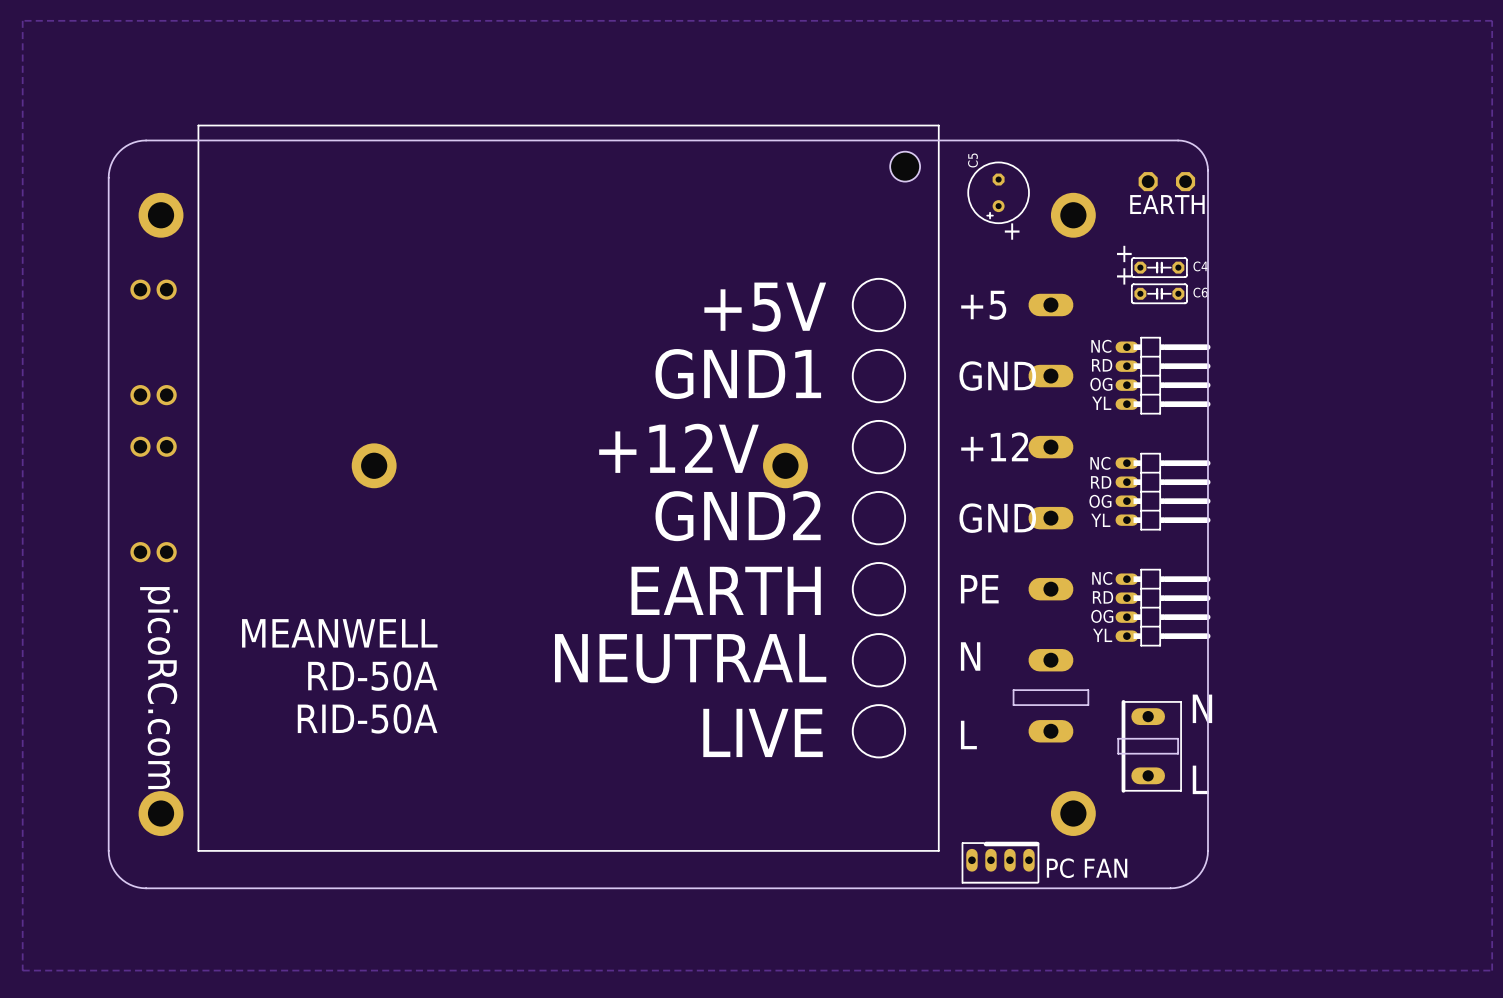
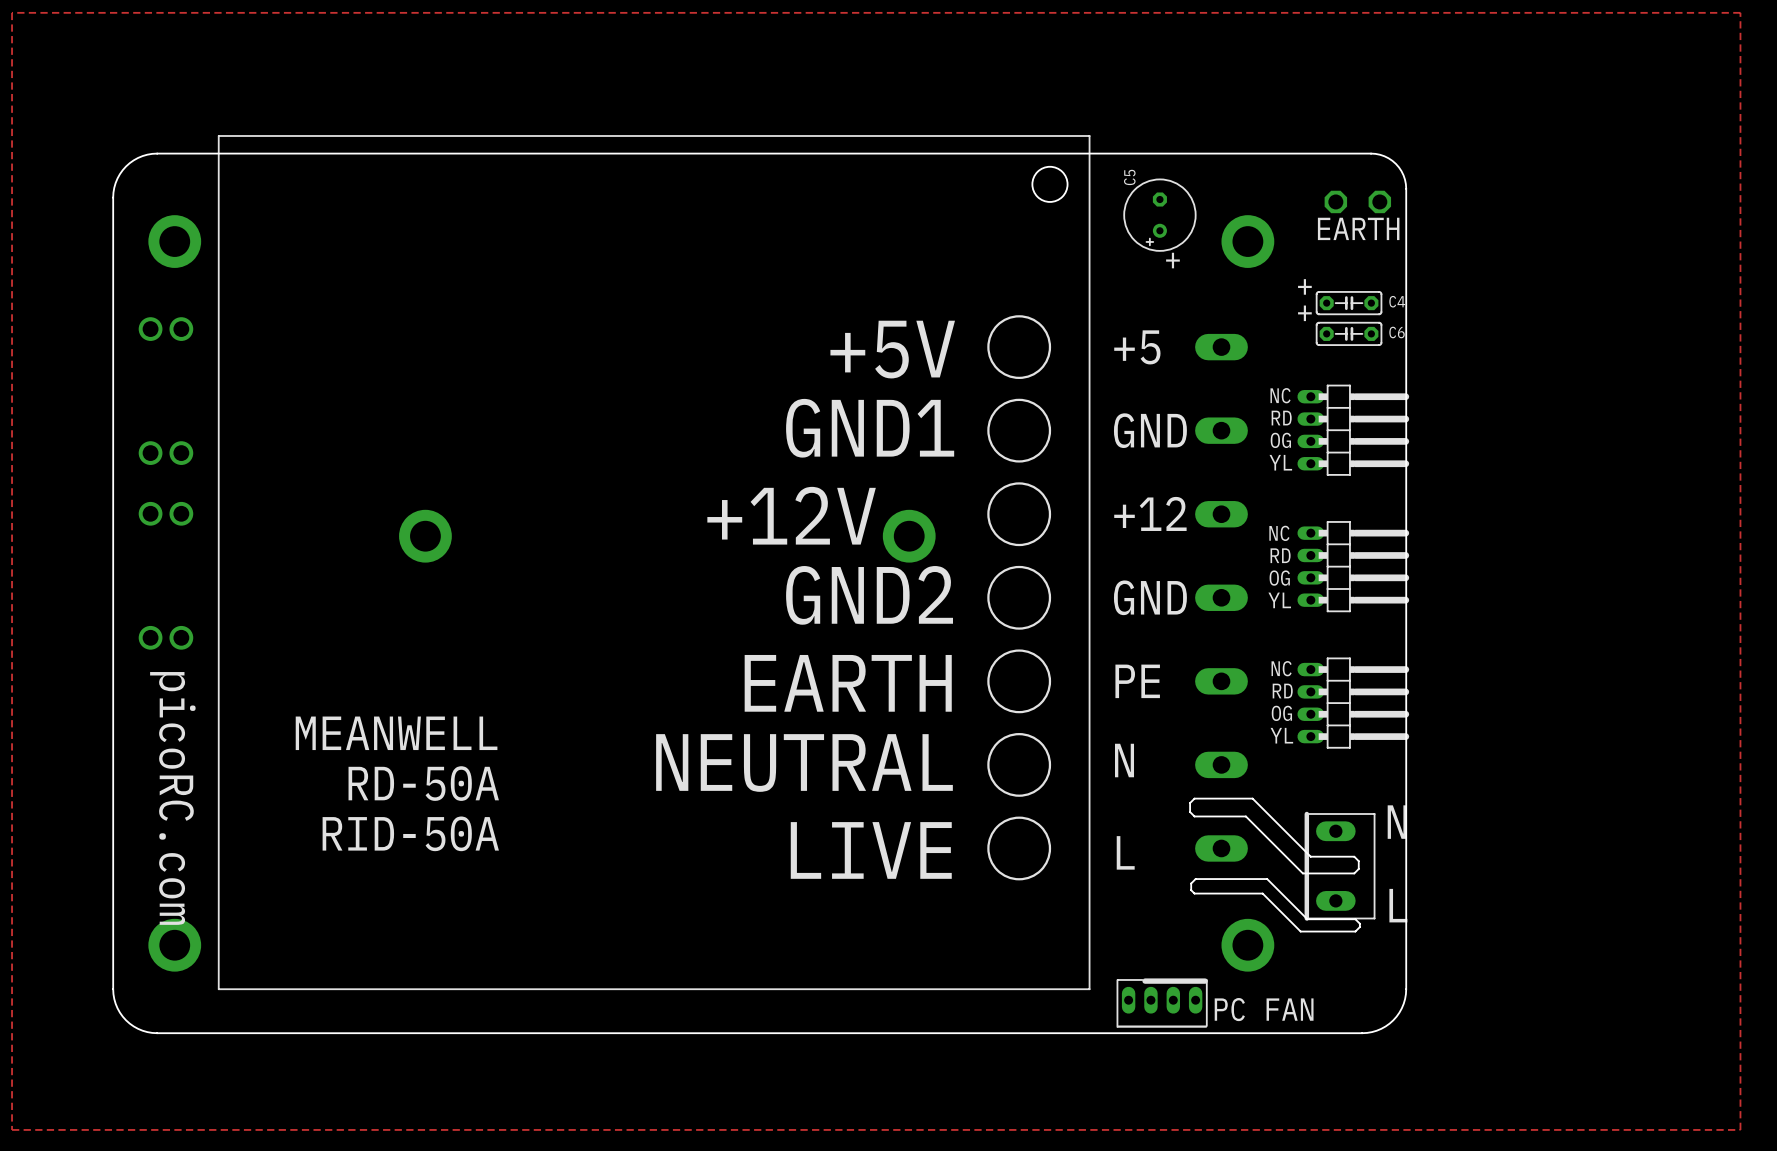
board edge: none -> (1194, 798) (1252, 798) (1310, 856) (1354, 856) (1358, 861) (1358, 868) (1354, 873) (1302, 873) (1245, 816) (1194, 816) (1190, 812) (1190, 803) (1194, 798)
board edge: (1013, 690) (1088, 690) (1088, 705) (1013, 705) (1013, 690) -> none
board edge: (1118, 738) (1178, 738) (1178, 753) (1118, 753) (1118, 738) -> none
board edge: none -> (1195, 879) (1267, 879) (1307, 919) (1355, 919) (1359, 923) (1359, 927) (1355, 931) (1300, 931) (1262, 893) (1194, 893) (1191, 890) (1191, 883) (1195, 879)

